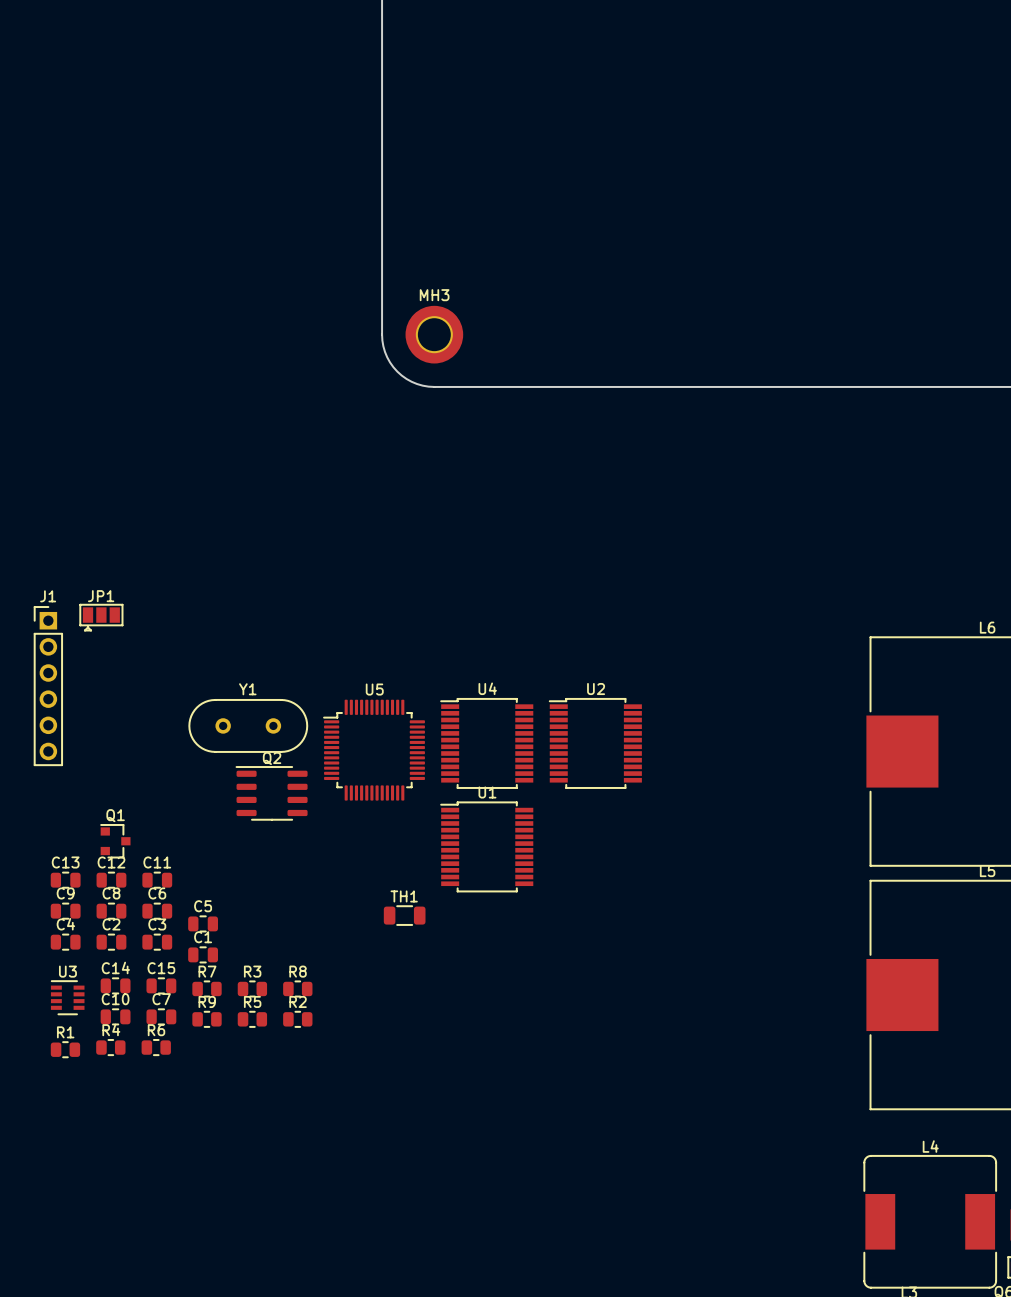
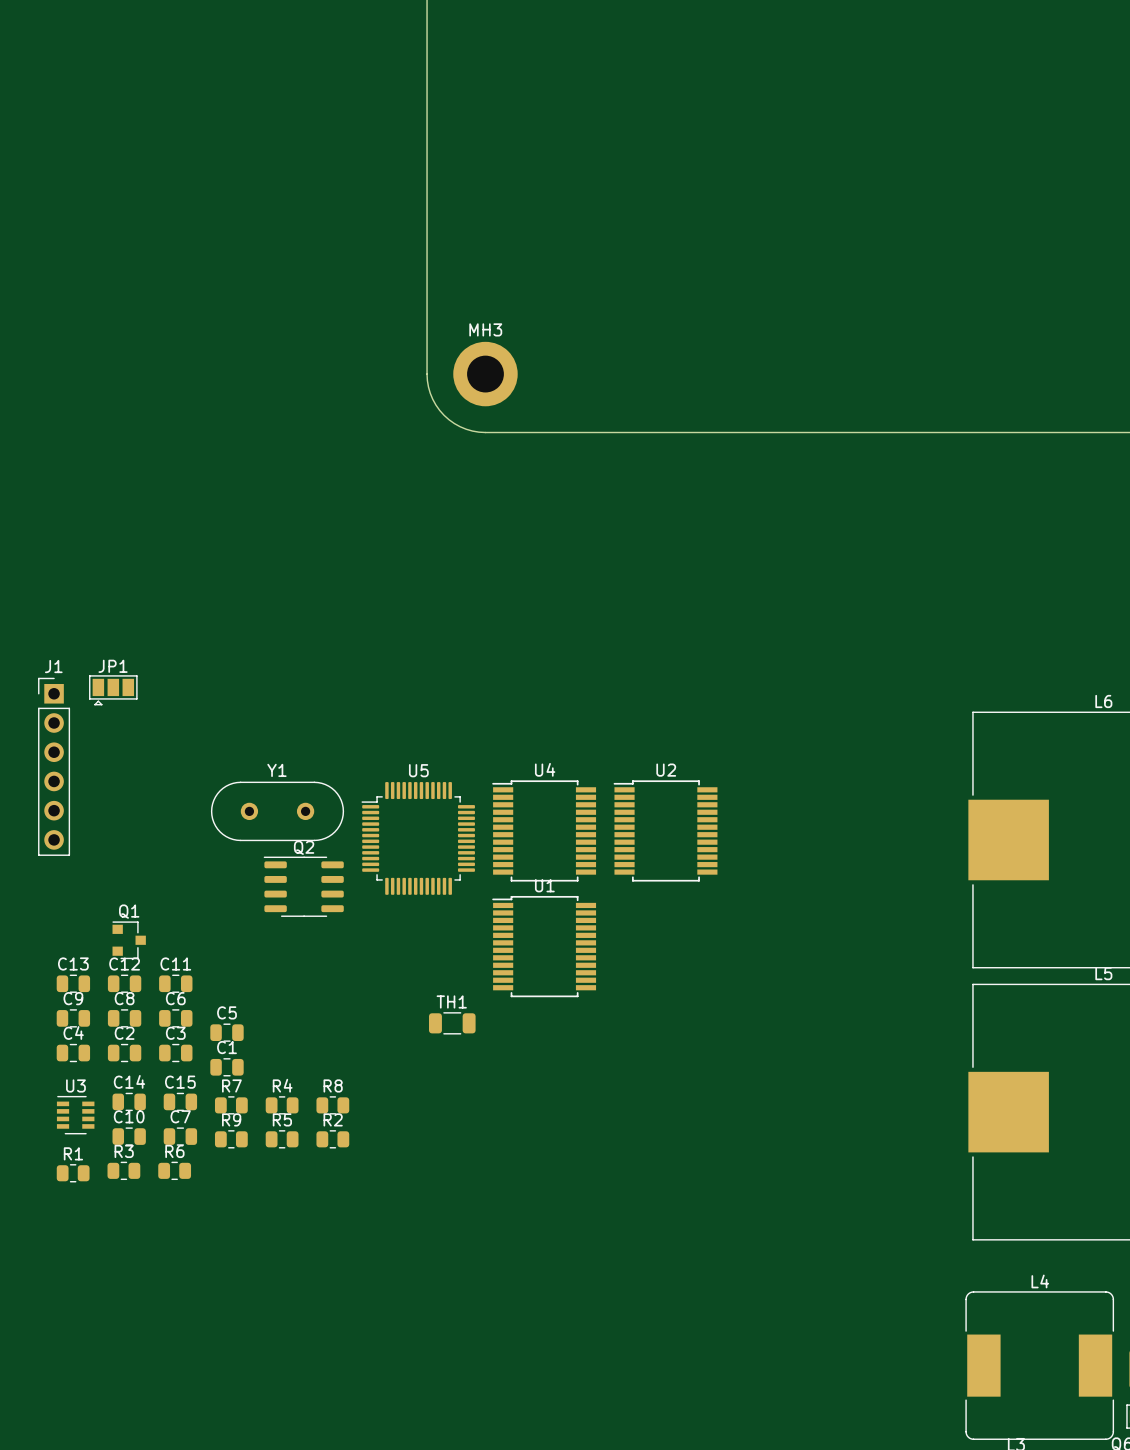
R3 name: R3 (252, 971) -> R4 (282, 1085)
R4 name: R4 (111, 1029) -> R3 (124, 1151)

